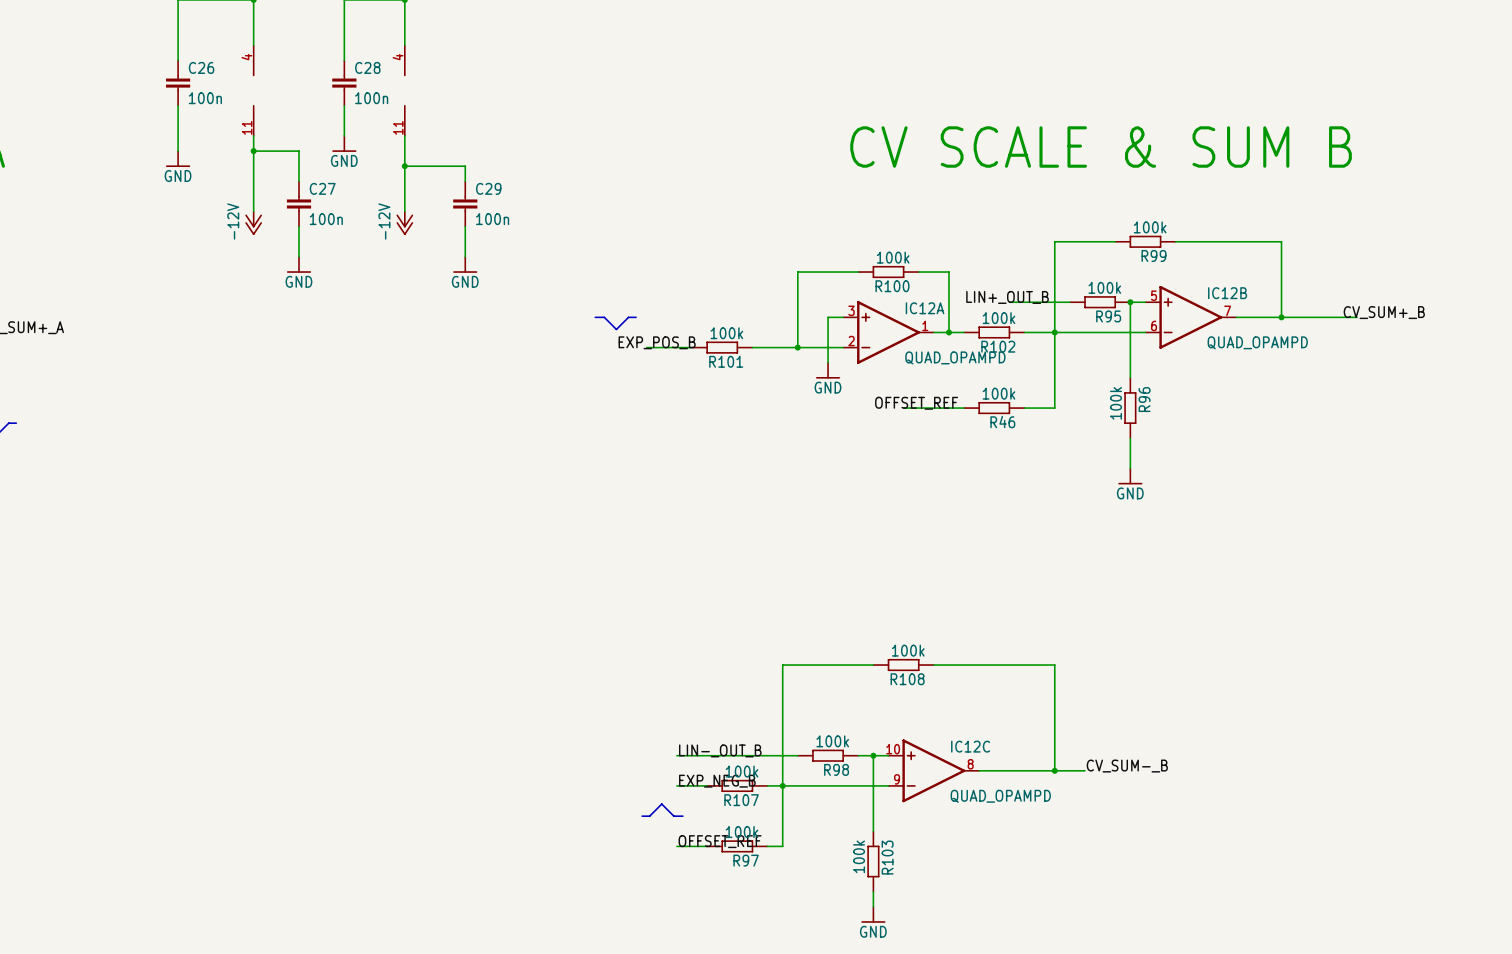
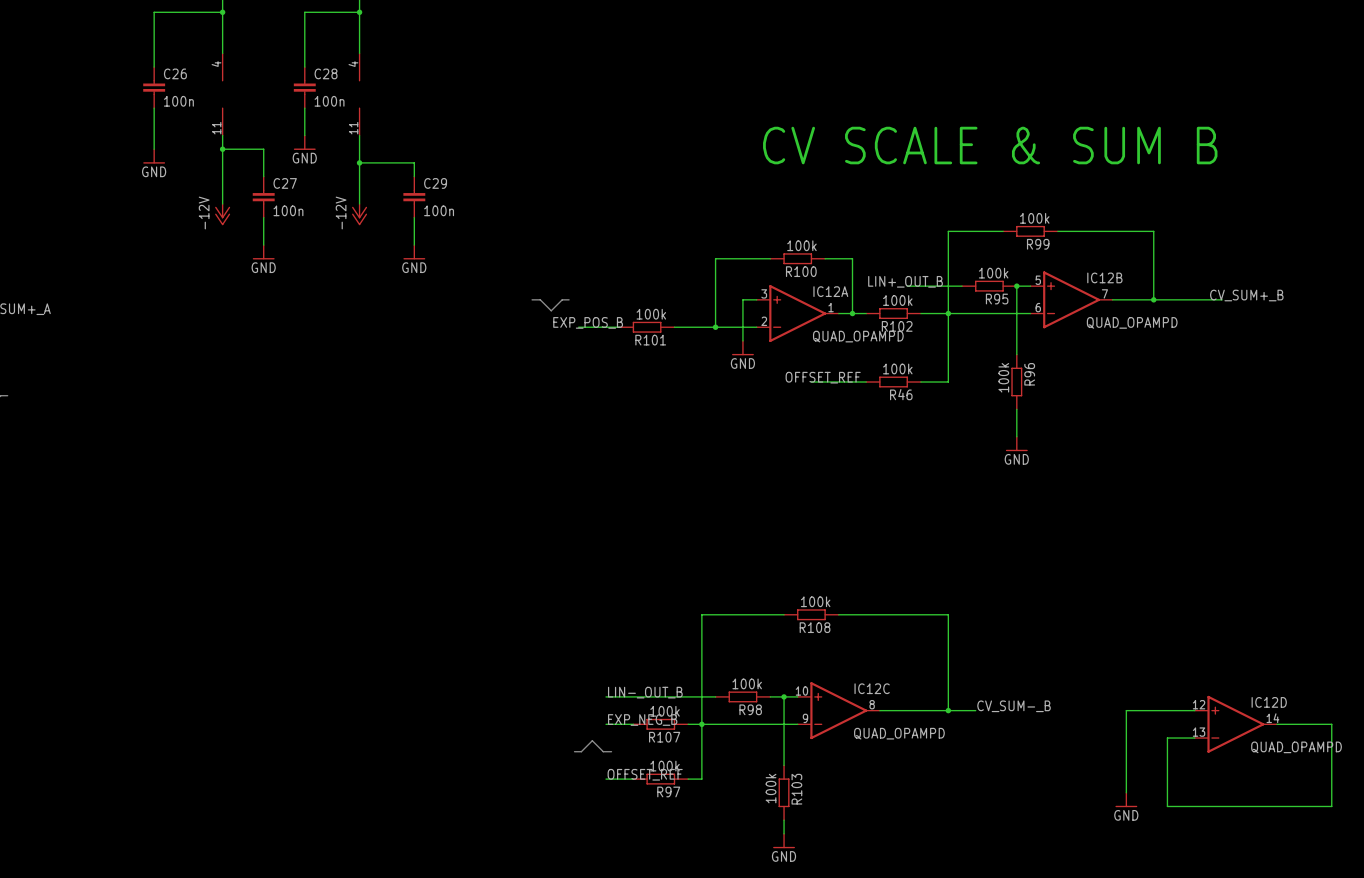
wire: none -> (1194, 710) (1126, 710) (1126, 792)
IC12D: none -> QUAD_OPAMPD (1235, 724)
wire: none -> (1276, 724) (1331, 724) (1331, 806) (1167, 806) (1167, 738) (1194, 738)
power symbol: none -> GND (1126, 799)

